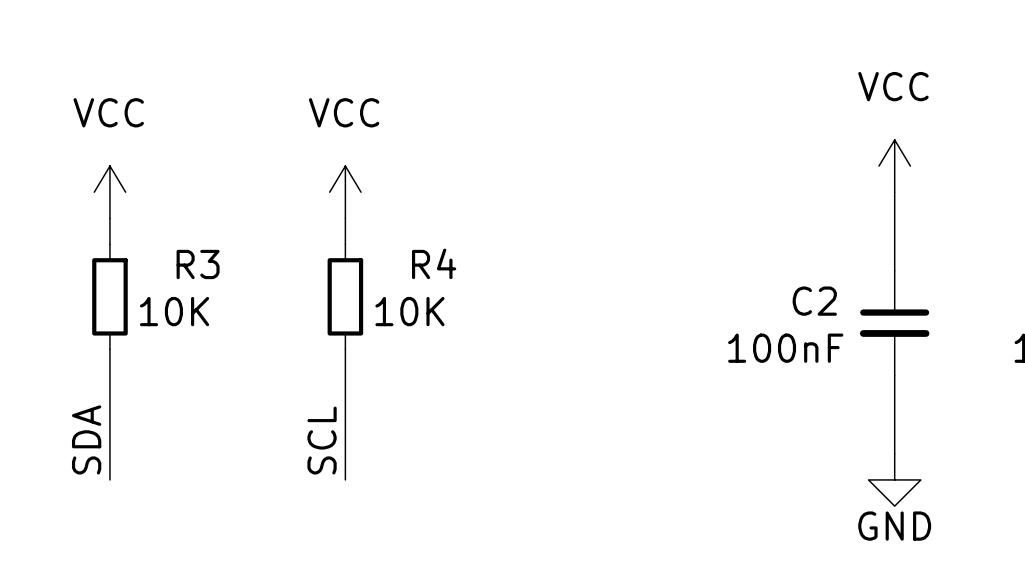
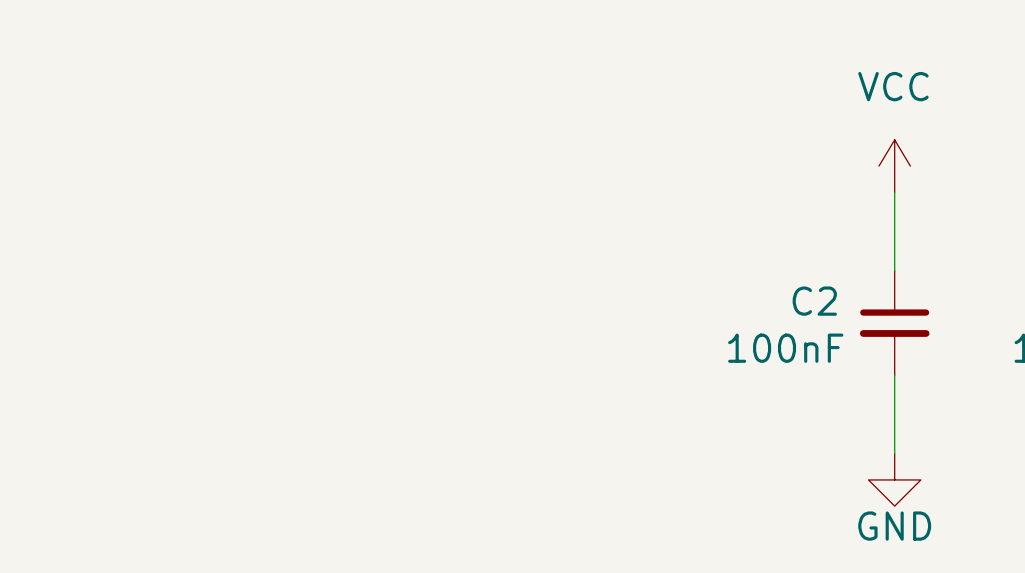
power symbol: VCC (109, 192) -> none
power symbol: VCC (345, 192) -> none
wire: (109, 218) (109, 244) -> none
wire: (345, 218) (345, 244) -> none
R3: 10K (109, 296) -> none
R4: 10K (345, 296) -> none
wire: (109, 349) (109, 479) -> none
wire: (345, 349) (345, 479) -> none
label: SDA (86, 439) -> none
label: SCL (322, 440) -> none

